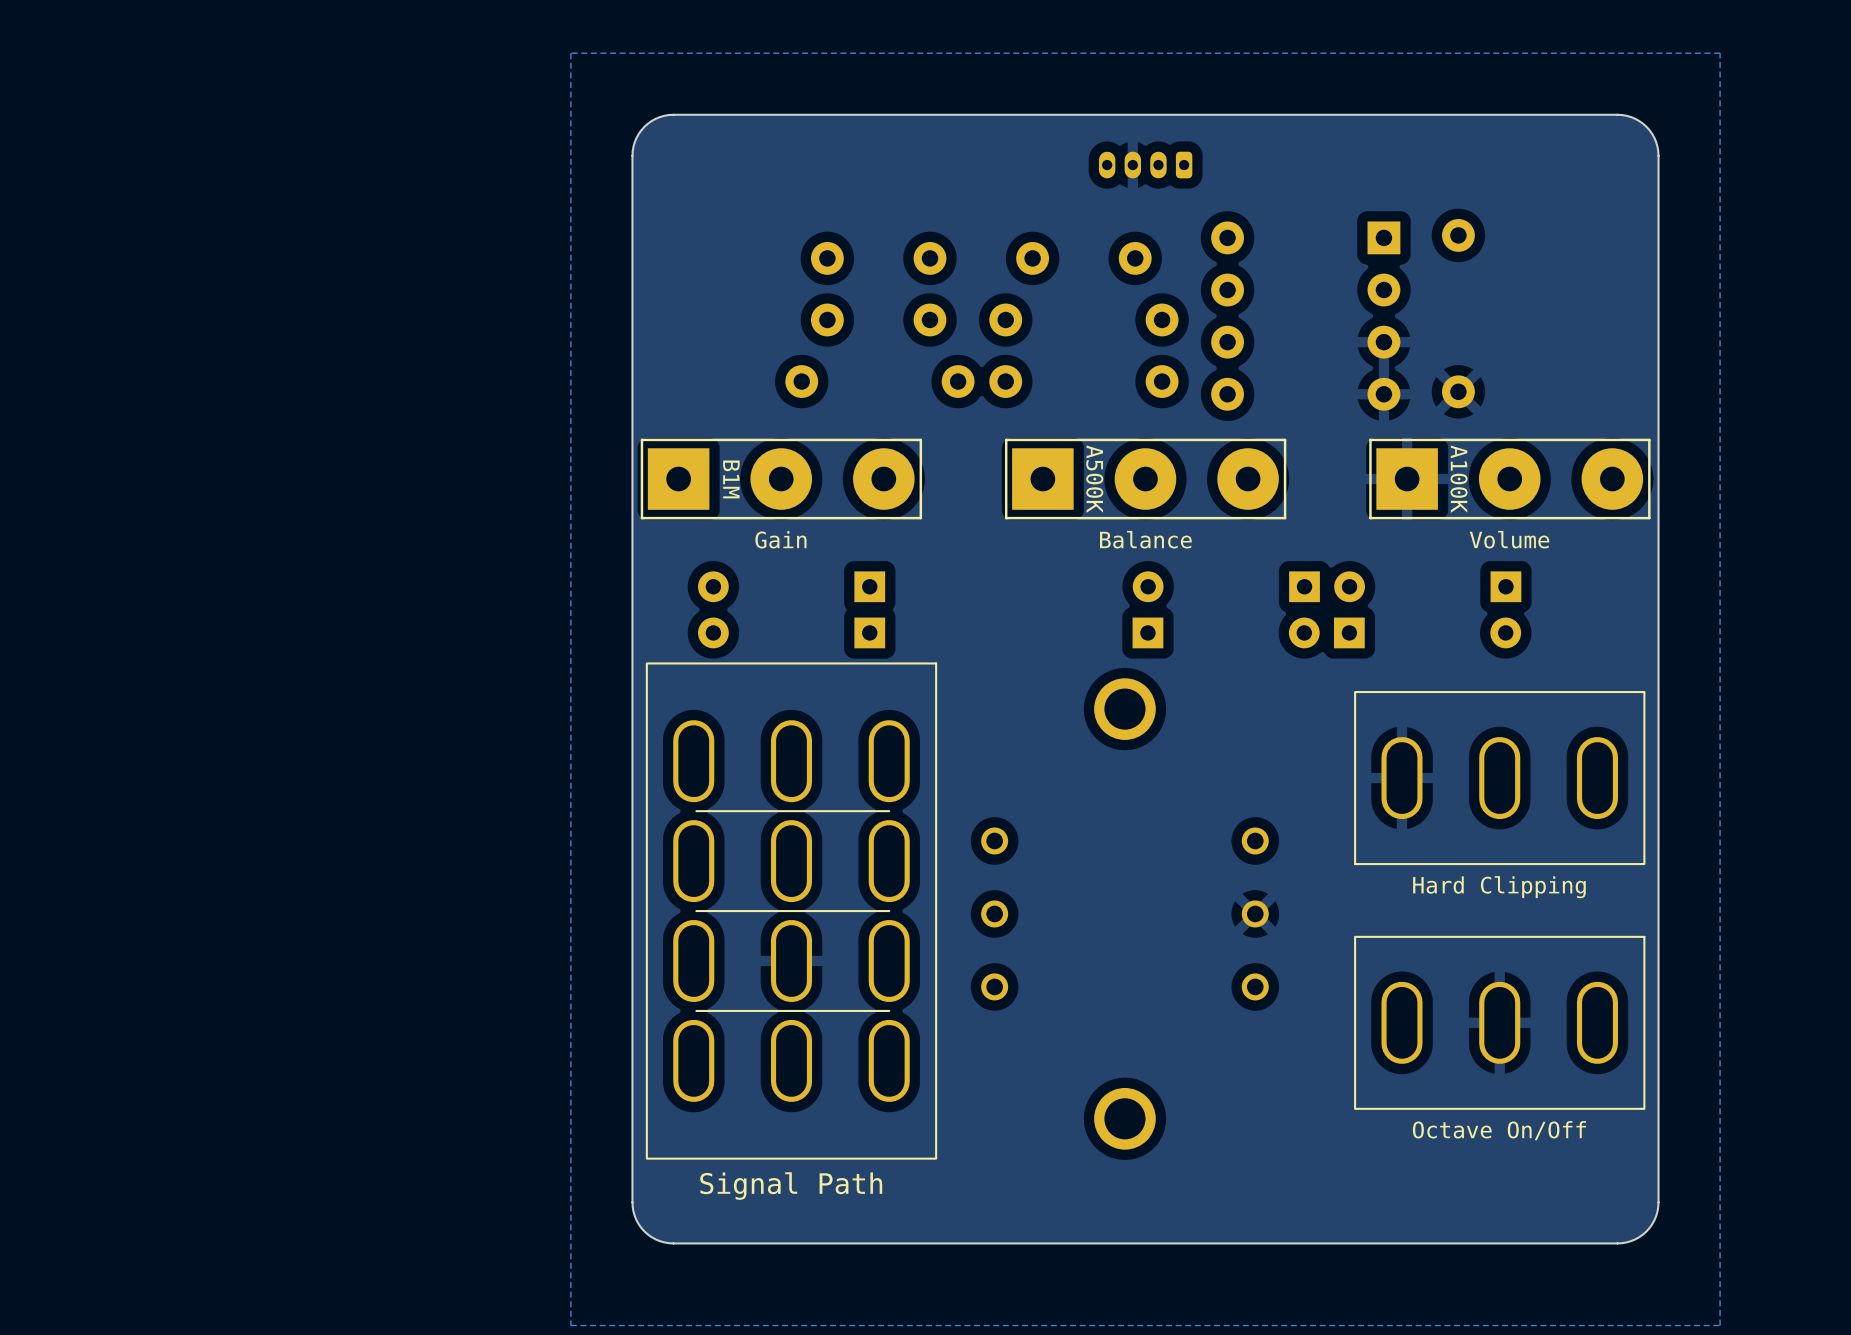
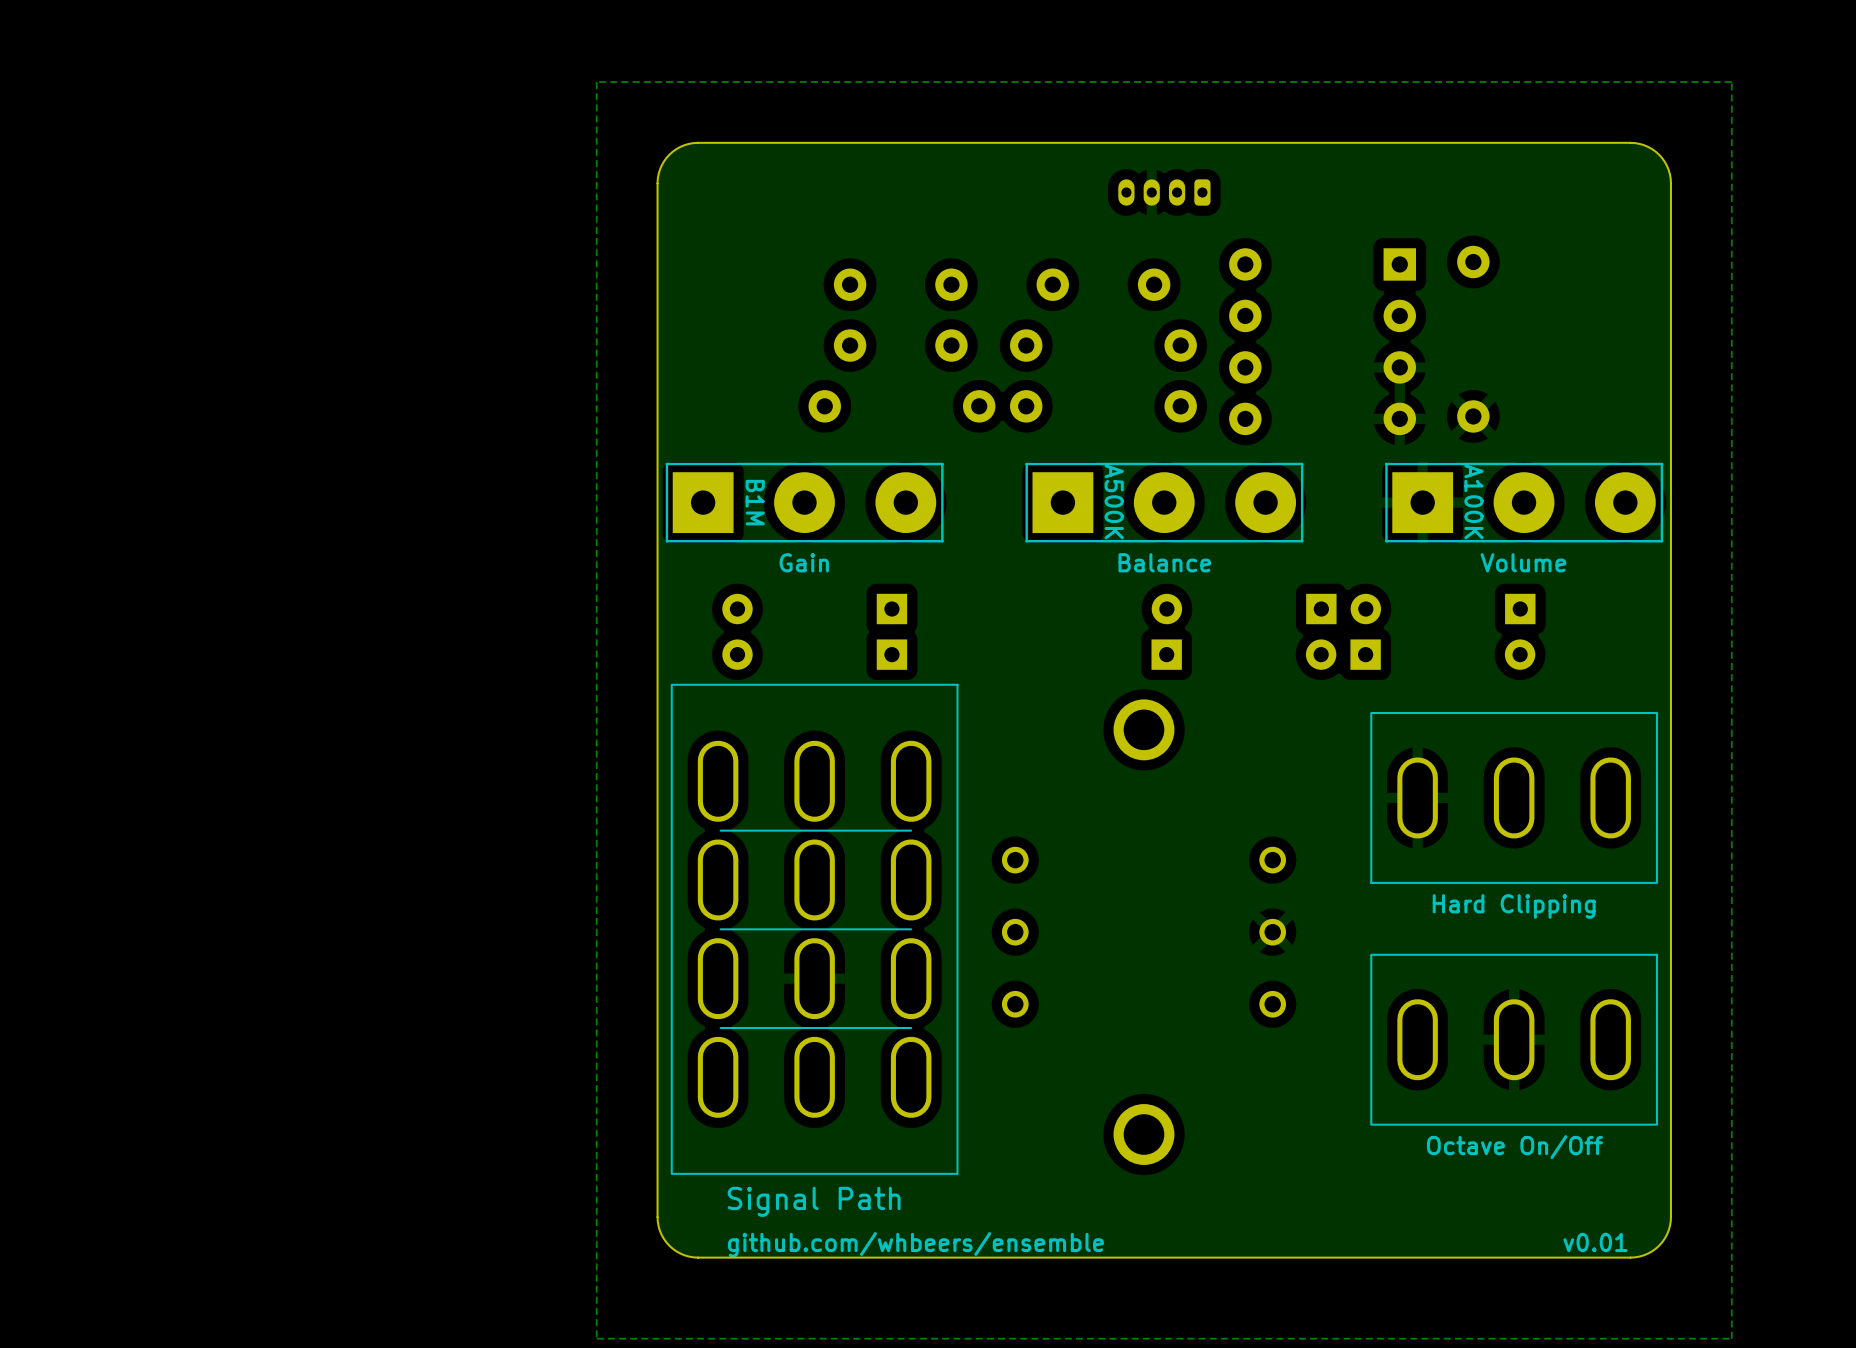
text: none -> github.com/whbeers/ensemble v0.01 (1177, 1244)

